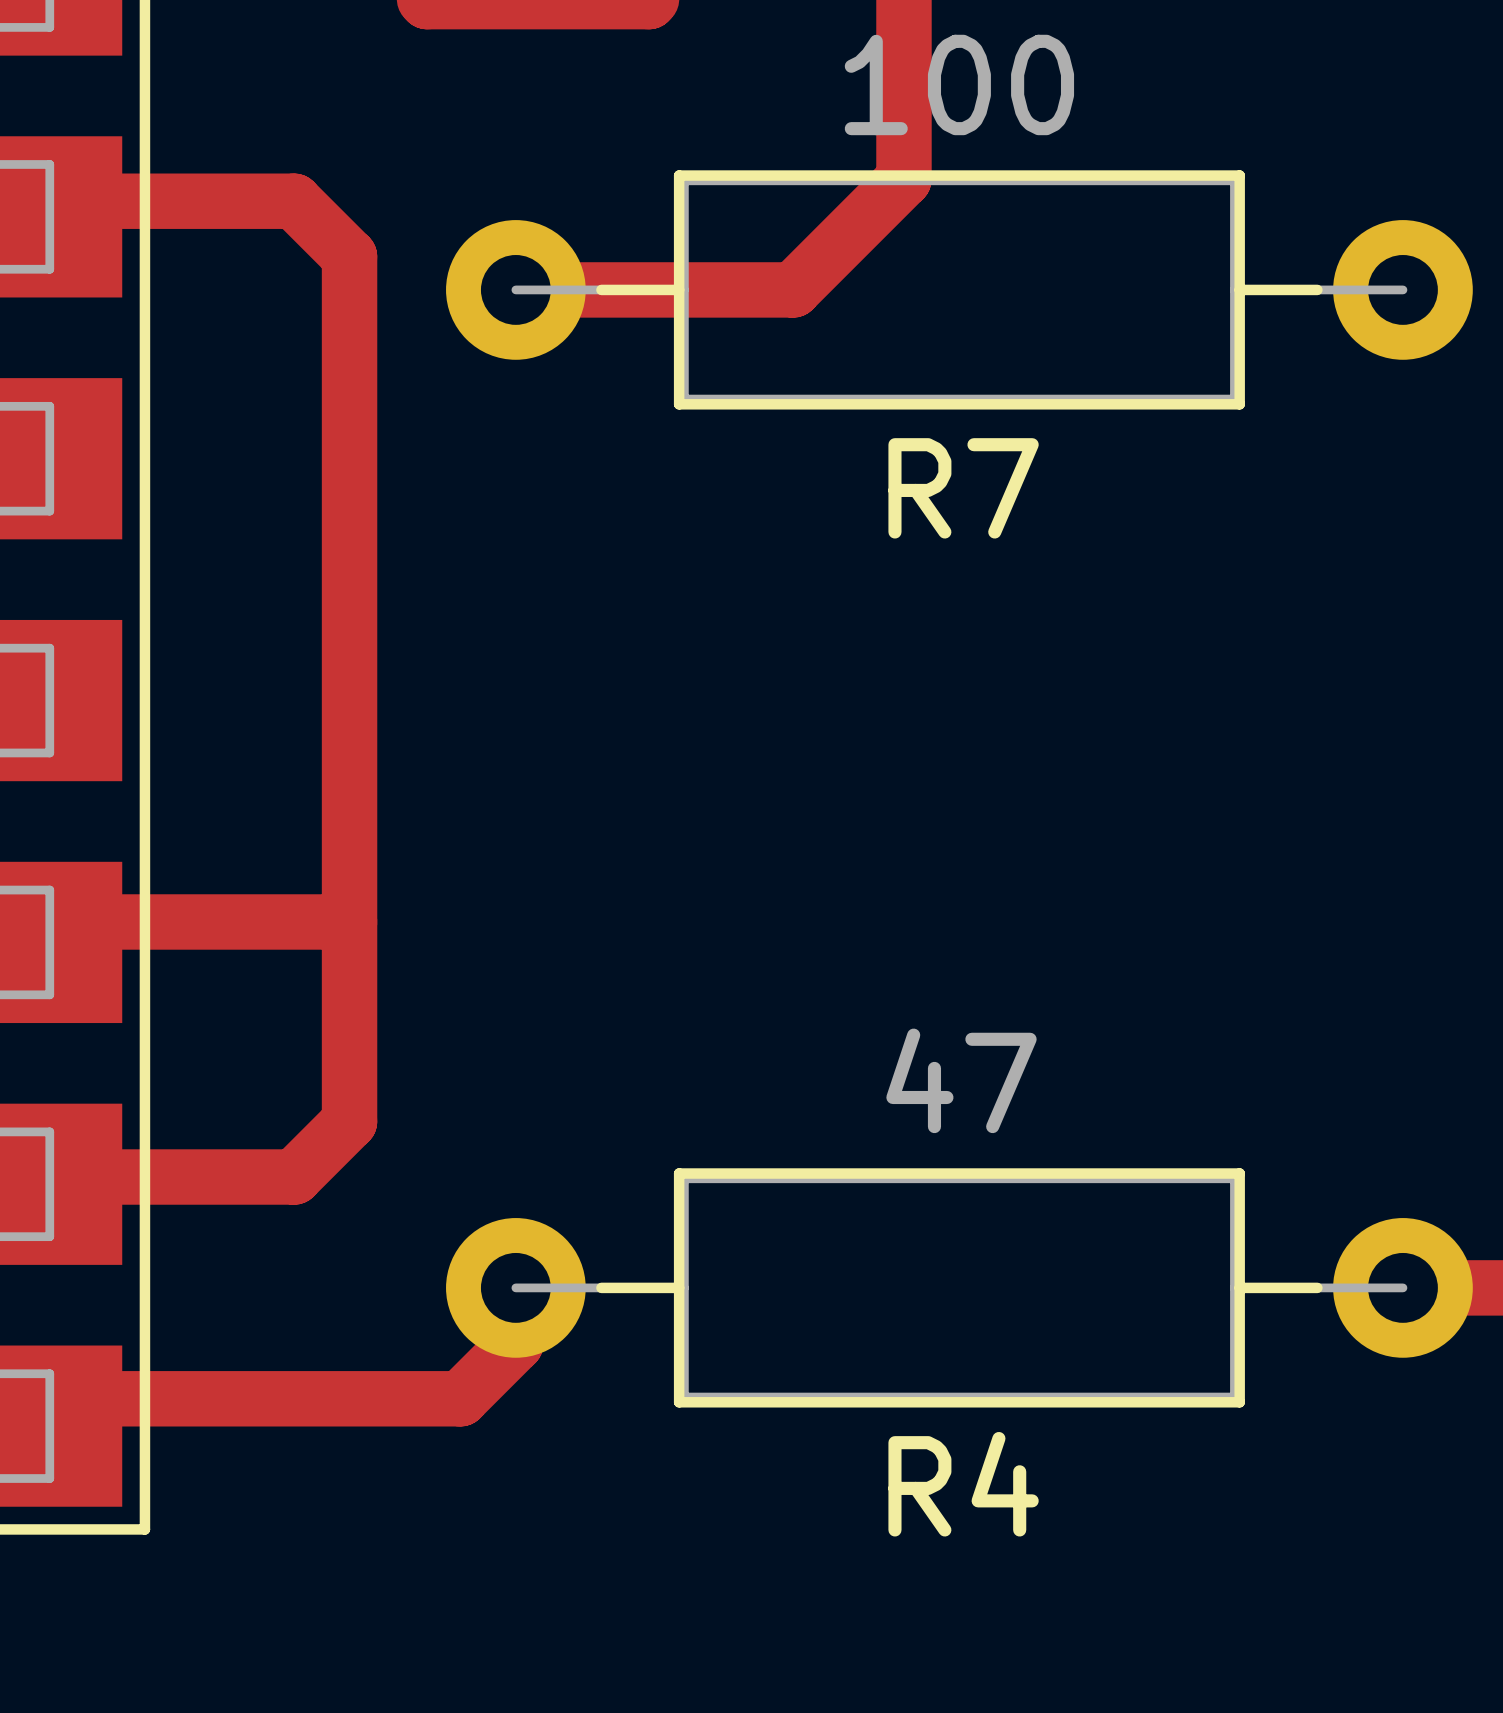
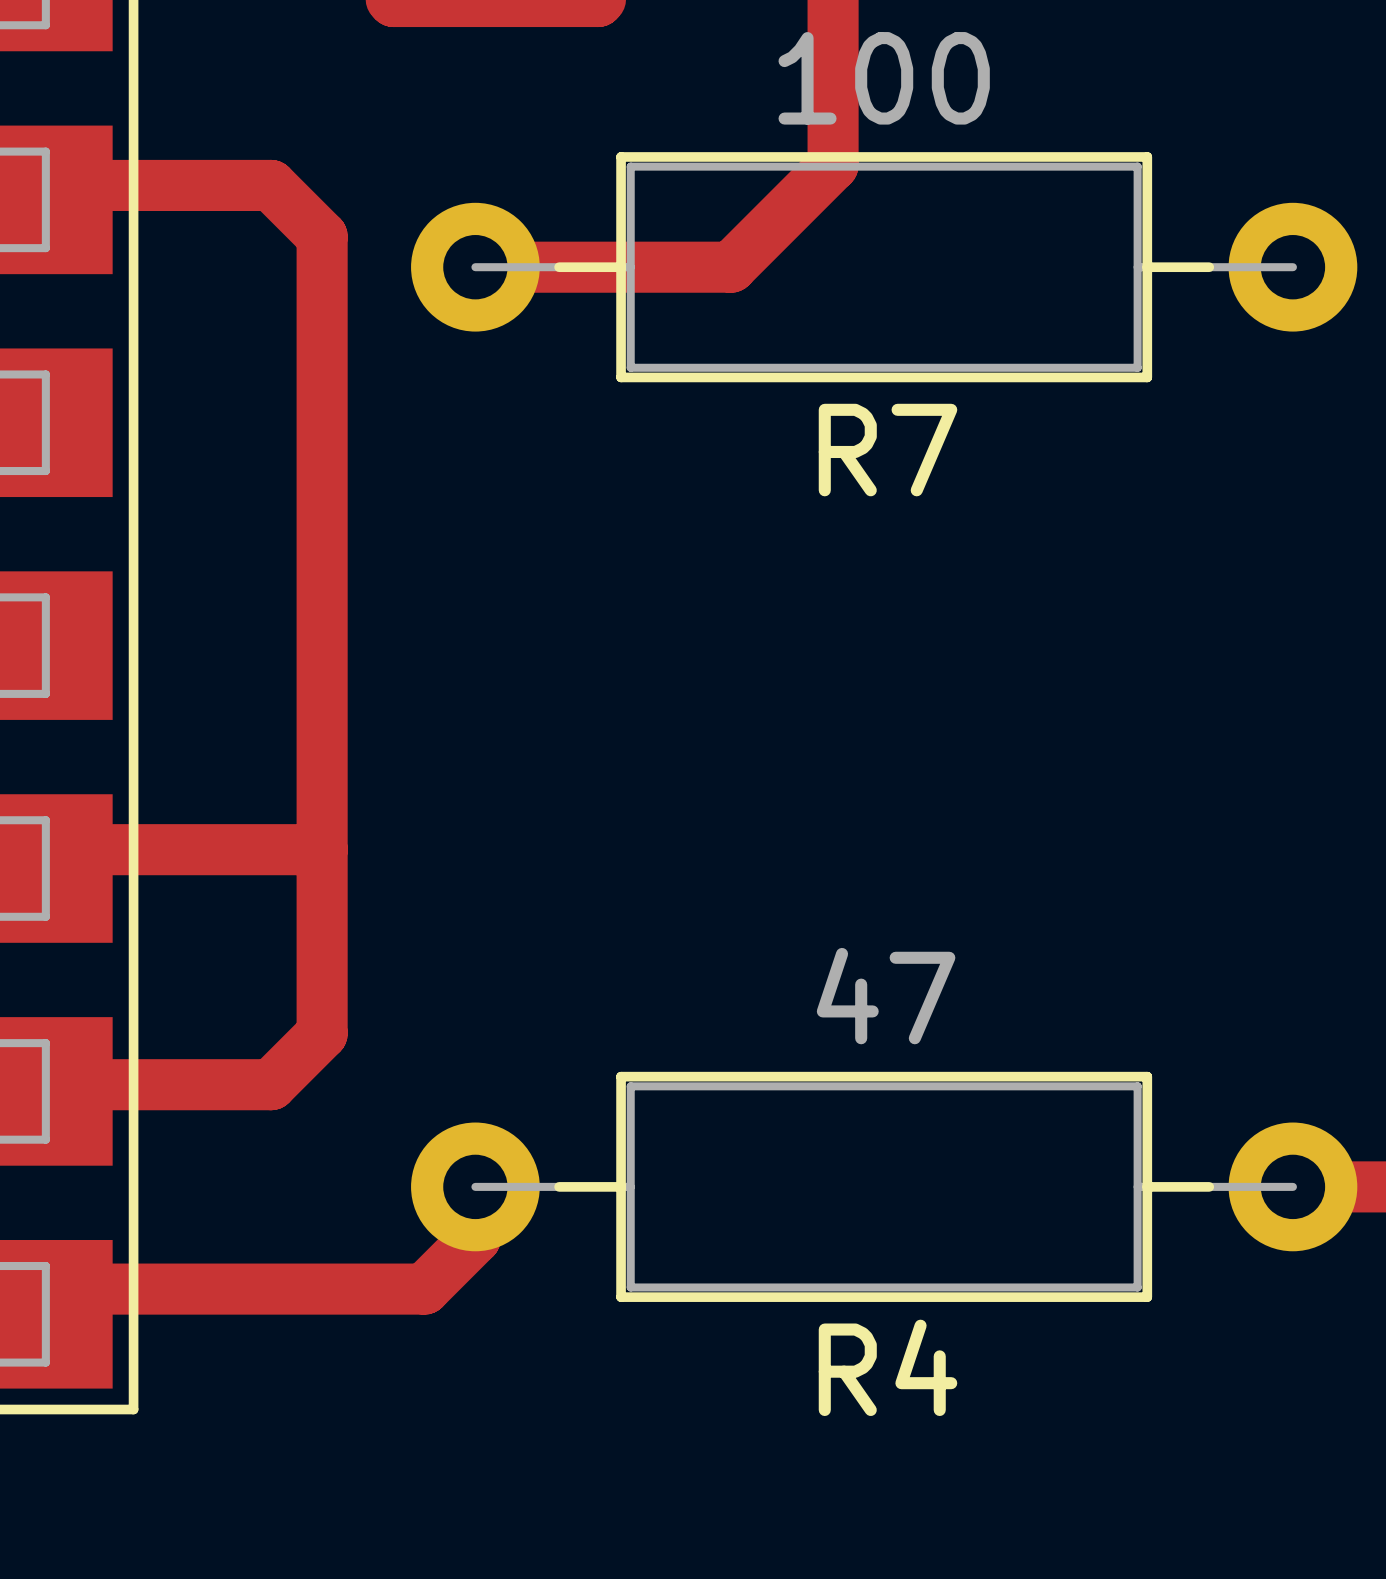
R7 footprint: [446, 170, 1473, 410] -> [411, 152, 1358, 383]
R4 footprint: [446, 1168, 1473, 1408] -> [411, 1071, 1358, 1302]

